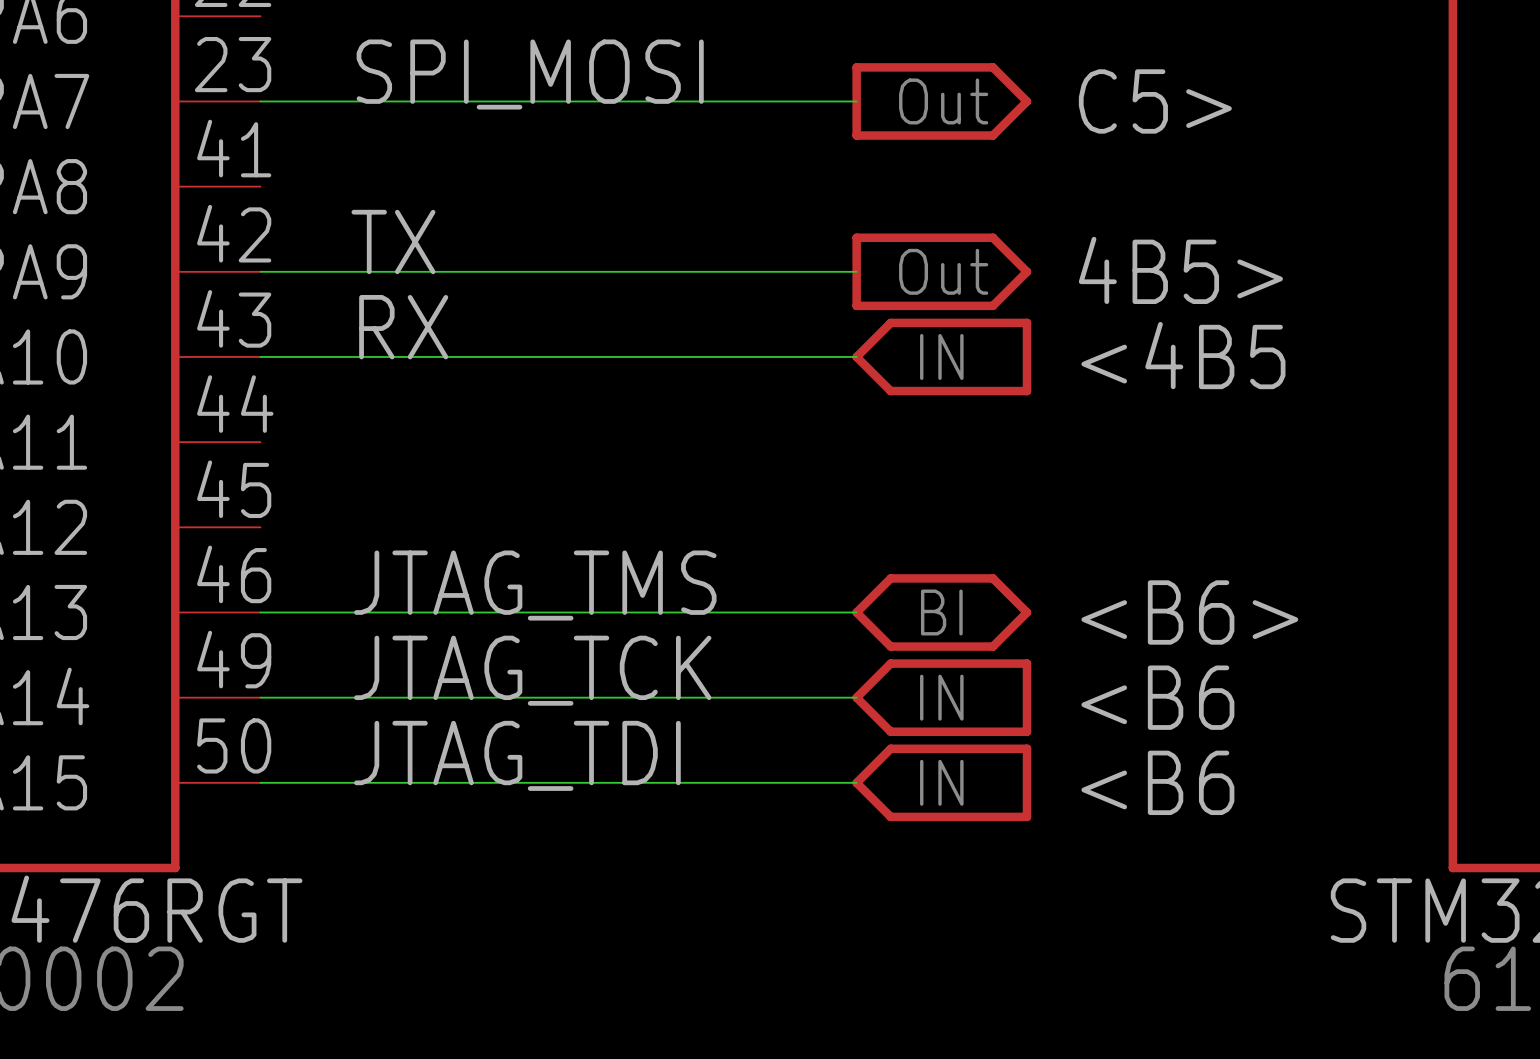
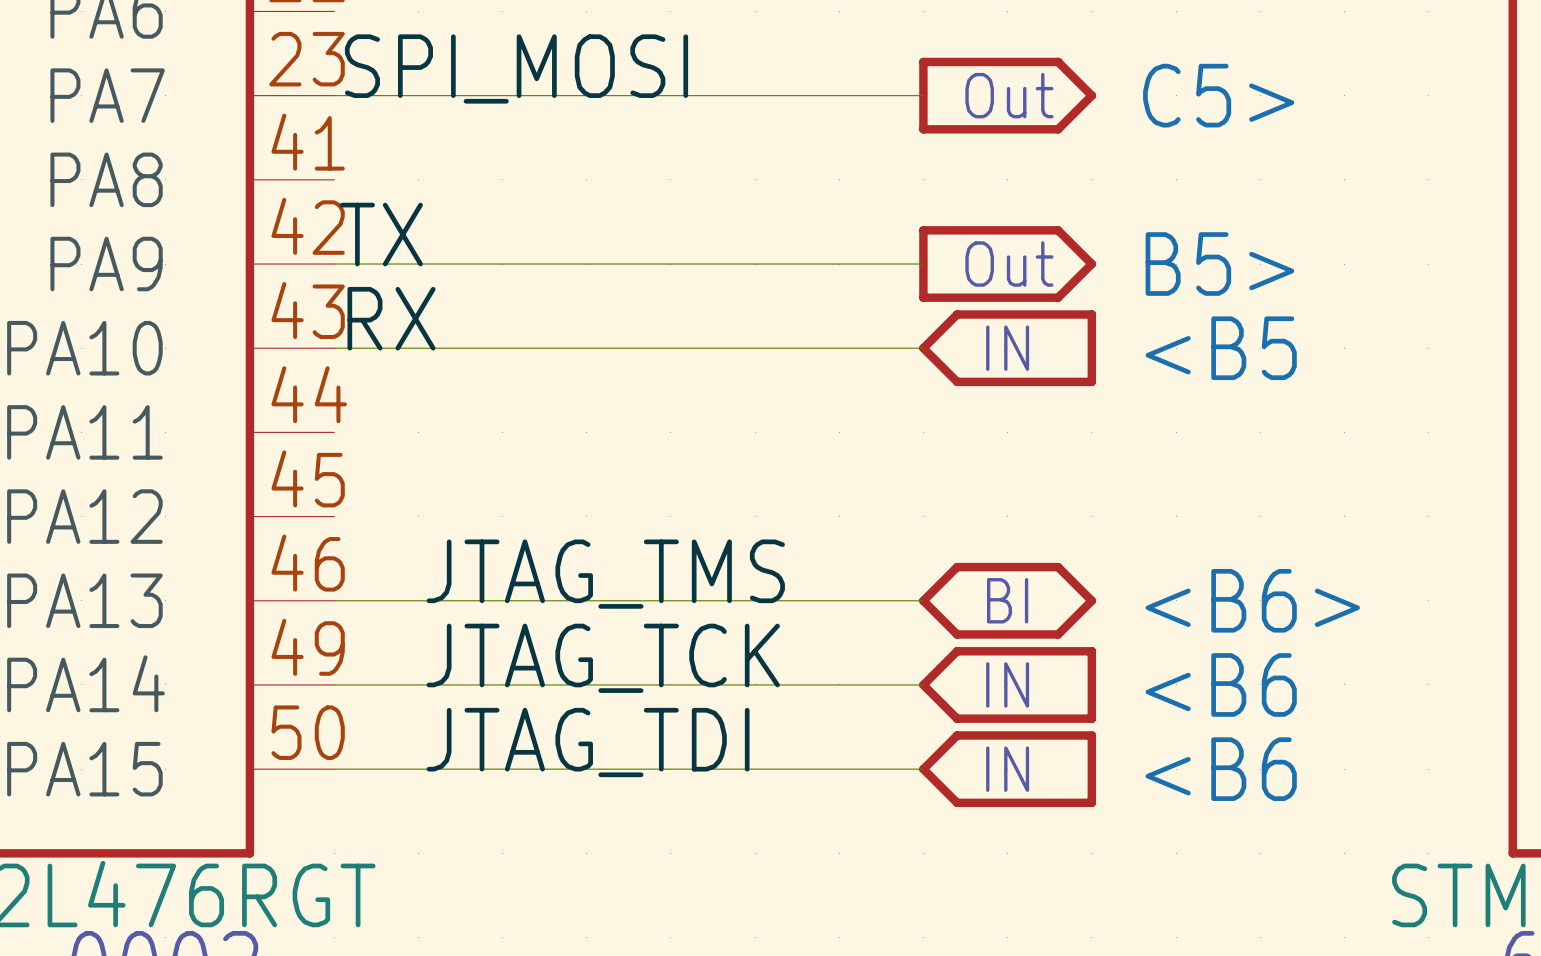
label position: SPI_MOSI (530, 74) -> SPI_MOSI (516, 68)
label position: TX (393, 242) -> TX (381, 234)
text: 4B5> (1180, 270) -> B5> (1219, 264)
label position: RX (403, 327) -> RX (391, 318)
text: <4B5 (1183, 355) -> <B5 (1221, 348)

